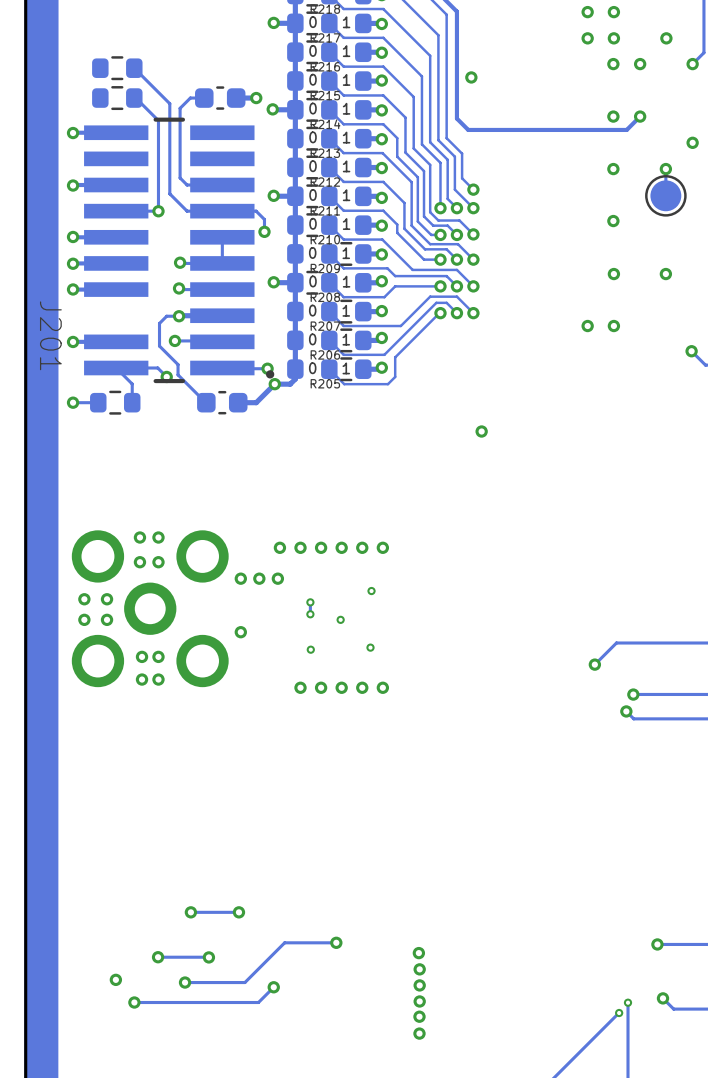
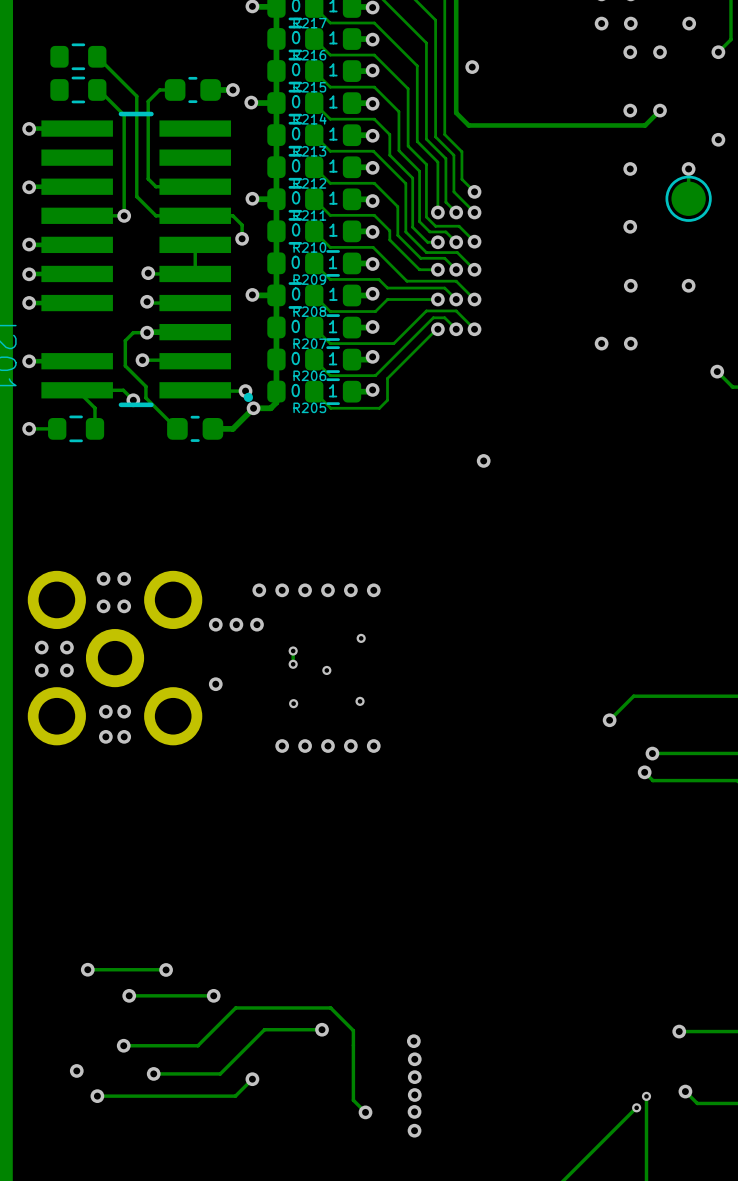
via: none -> (87, 969)
track: none -> (165, 969) (87, 969)
via: none -> (166, 969)
via: none -> (129, 995)
track: none -> (160, 995) (129, 995)
via: (190, 912) -> none
track: none -> (180, 1045) (197, 1045) (235, 1007) (330, 1007) (353, 1030) (353, 1100) (365, 1112)
via: (208, 957) -> none
via: none -> (365, 1112)

